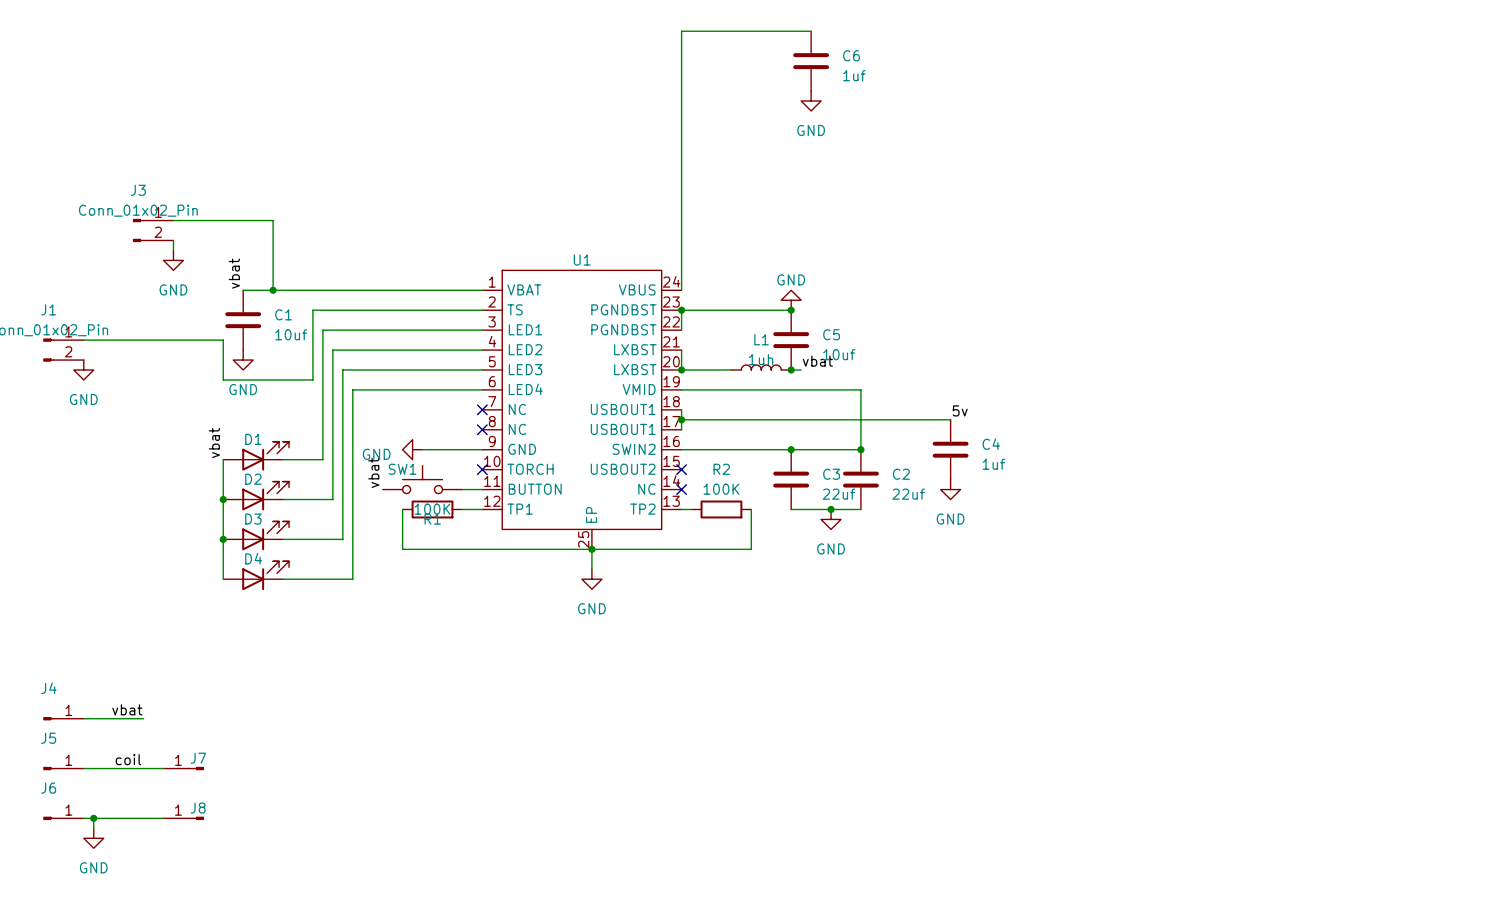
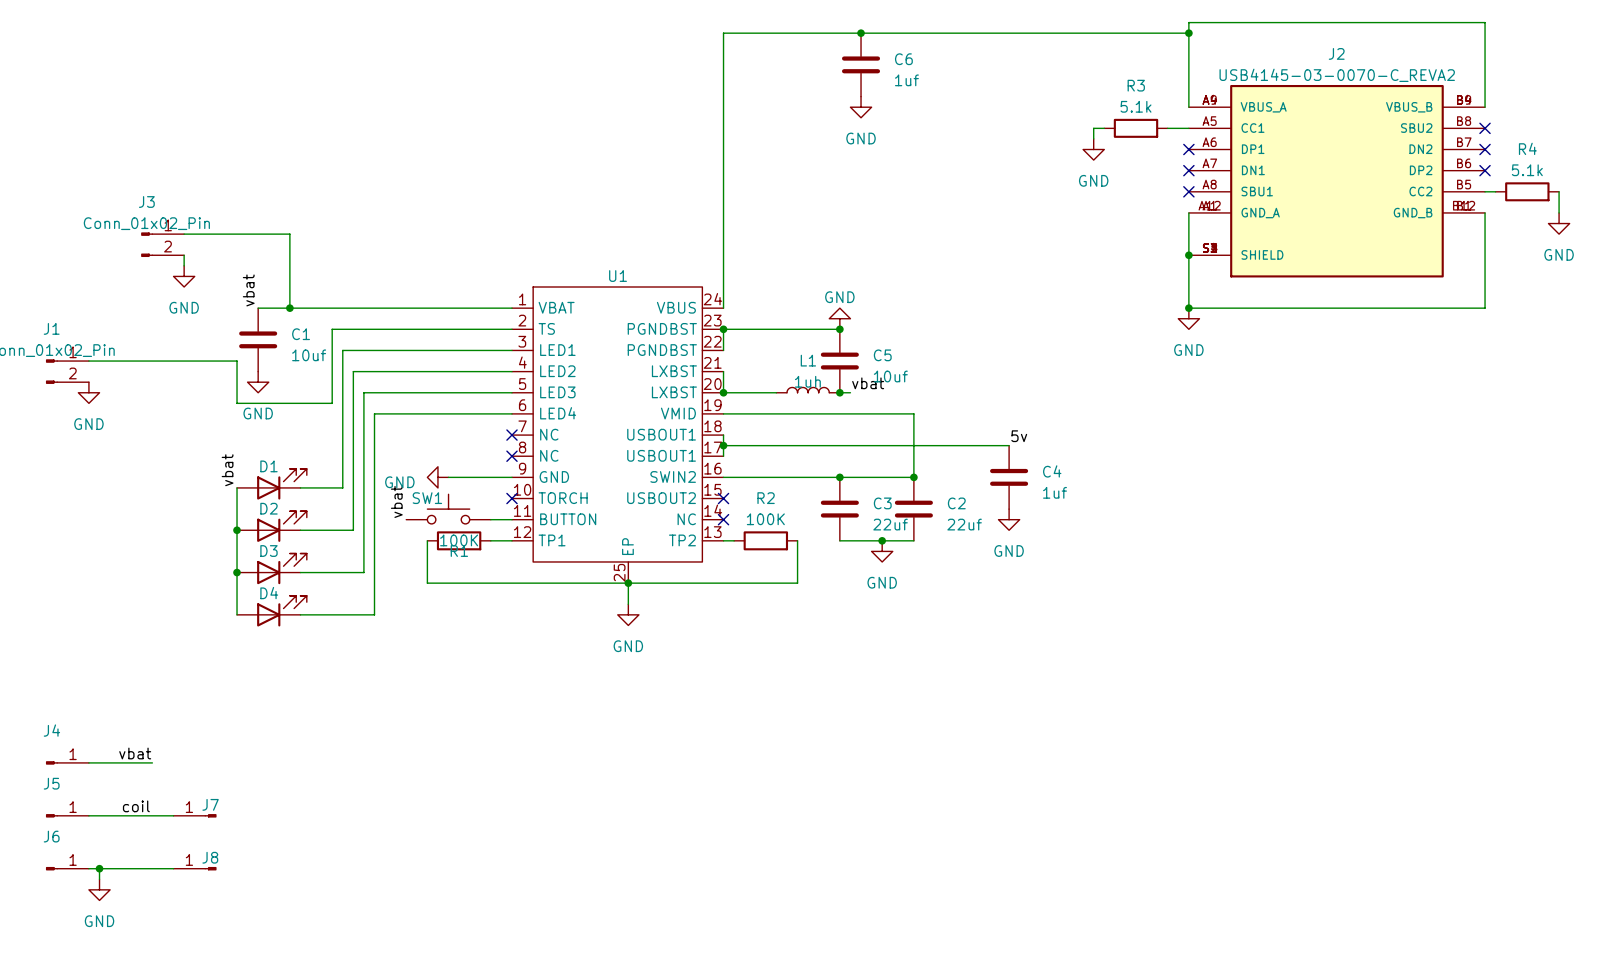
wire: none -> (861, 33) (1188, 33)
junction: none -> (861, 33)
junction: none -> (1188, 33)
wire: none -> (1188, 107) (1188, 22) (1485, 22) (1485, 107)
wire: none -> (1104, 128) (1093, 128) (1093, 138)
R3: none -> 5.1k (1136, 128)
wire: none -> (1167, 128) (1188, 128)
no-connect mark: none -> (1485, 128)
power symbol: none -> GND (1093, 149)
no-connect mark: none -> (1188, 149)
no-connect mark: none -> (1485, 149)
no-connect mark: none -> (1188, 170)
no-connect mark: none -> (1485, 170)
J2: none -> USB4145-03-0070-C_REVA2 (1336, 181)
no-connect mark: none -> (1188, 191)
wire: none -> (1485, 191) (1495, 191)
R4: none -> 5.1k (1527, 191)
wire: none -> (1559, 191) (1559, 212)
wire: none -> (1188, 212) (1188, 308) (1485, 308) (1485, 212)
power symbol: none -> GND (1559, 223)
junction: none -> (1188, 255)
junction: none -> (1188, 308)
power symbol: none -> GND (1188, 318)

